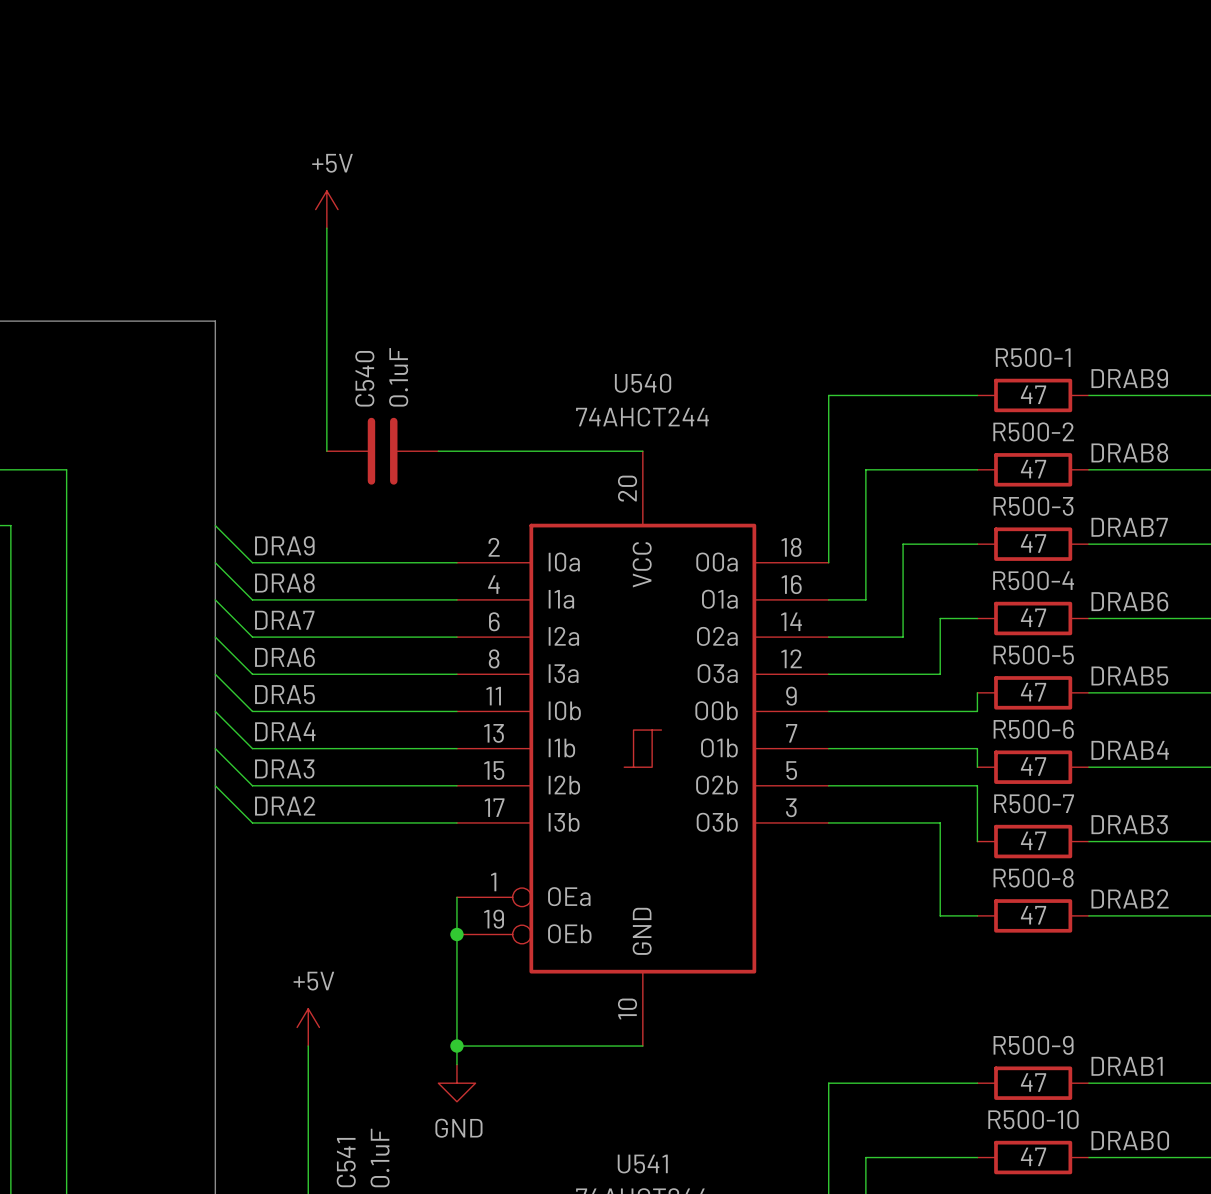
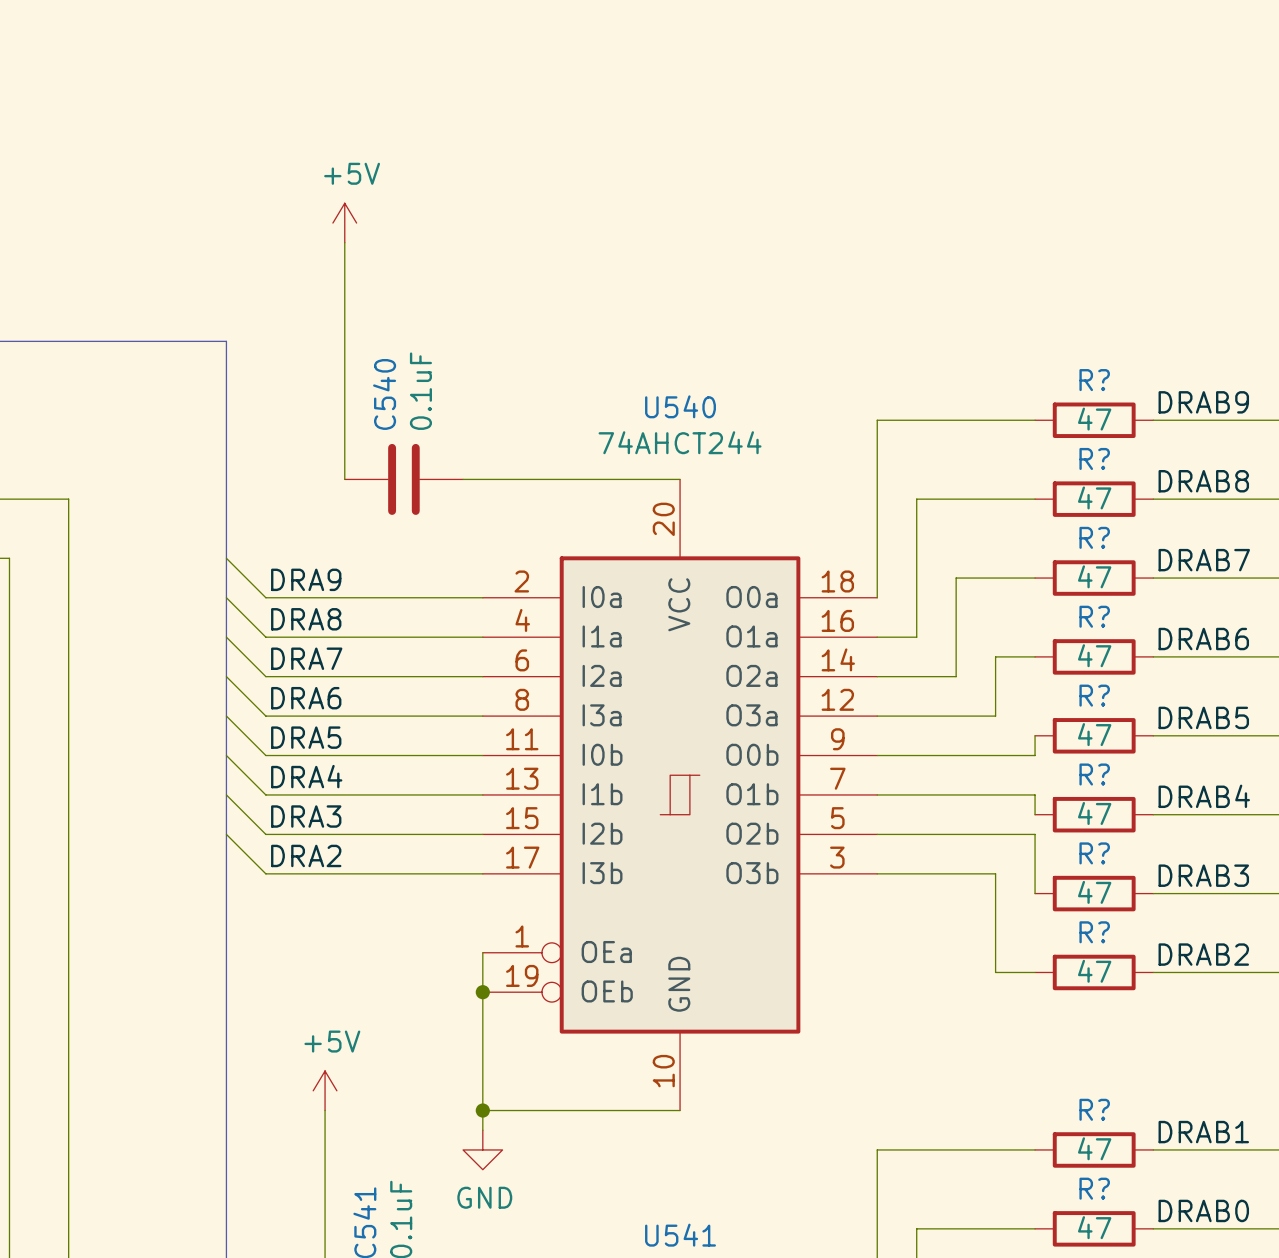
R500-1 name: R500-1 (1033, 357) -> R? (1094, 380)
R500-2 name: R500-2 (1033, 431) -> R? (1094, 458)
R500-3 name: R500-3 (1033, 506) -> R? (1094, 537)
R500-4 name: R500-4 (1033, 580) -> R? (1094, 616)
R500-5 name: R500-5 (1033, 655) -> R? (1094, 695)
R500-6 name: R500-6 (1033, 729) -> R? (1094, 774)
R500-7 name: R500-7 (1034, 803) -> R? (1094, 853)
R500-8 name: R500-8 (1033, 878) -> R? (1094, 932)
R500-9 name: R500-9 (1033, 1045) -> R? (1094, 1109)
R500-10 name: R500-10 (1033, 1119) -> R? (1094, 1188)

